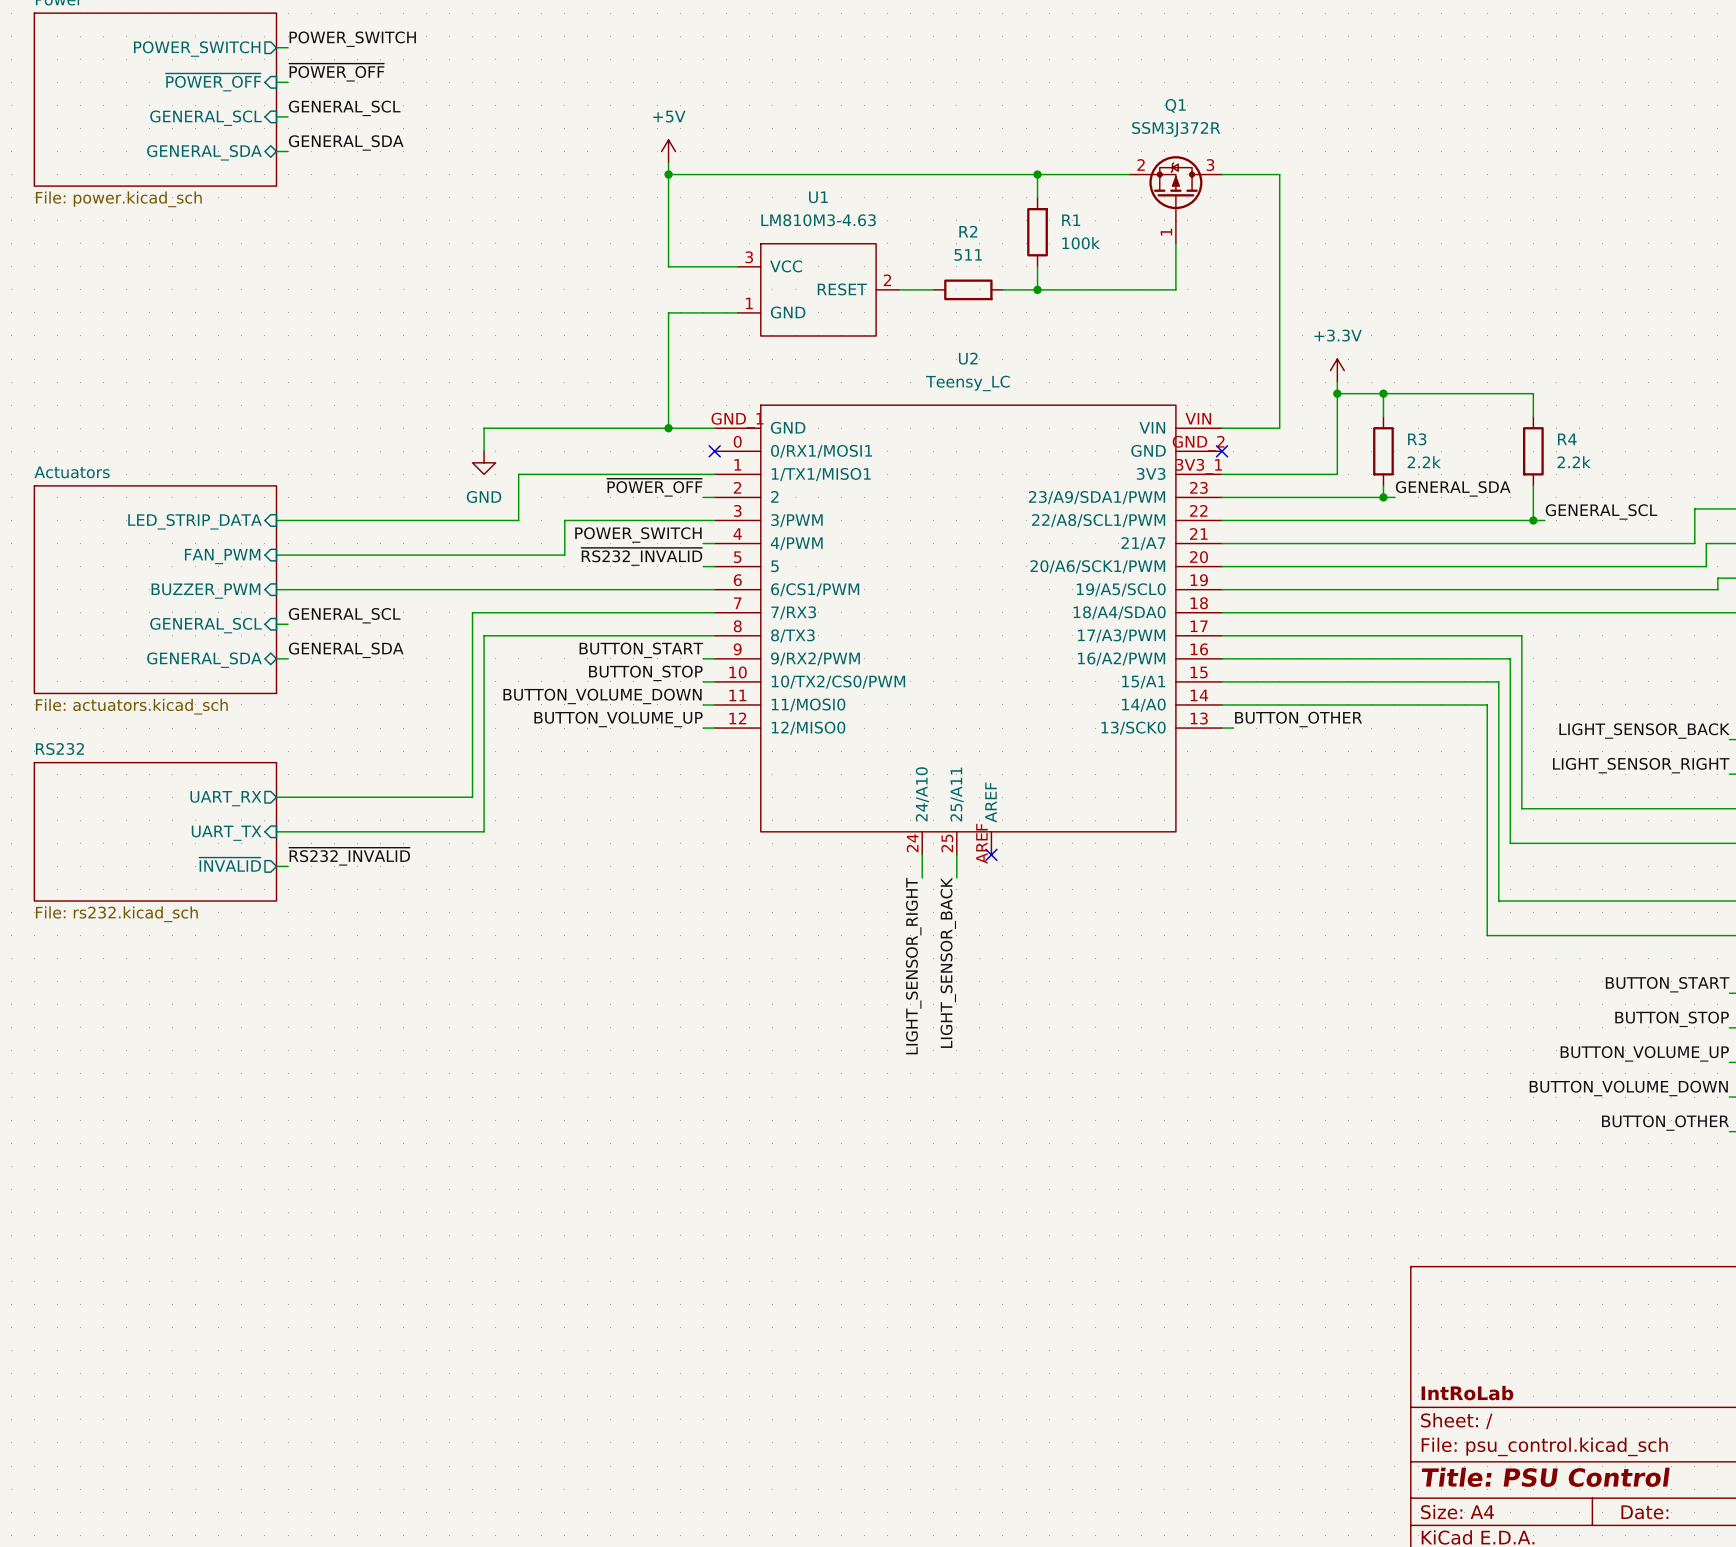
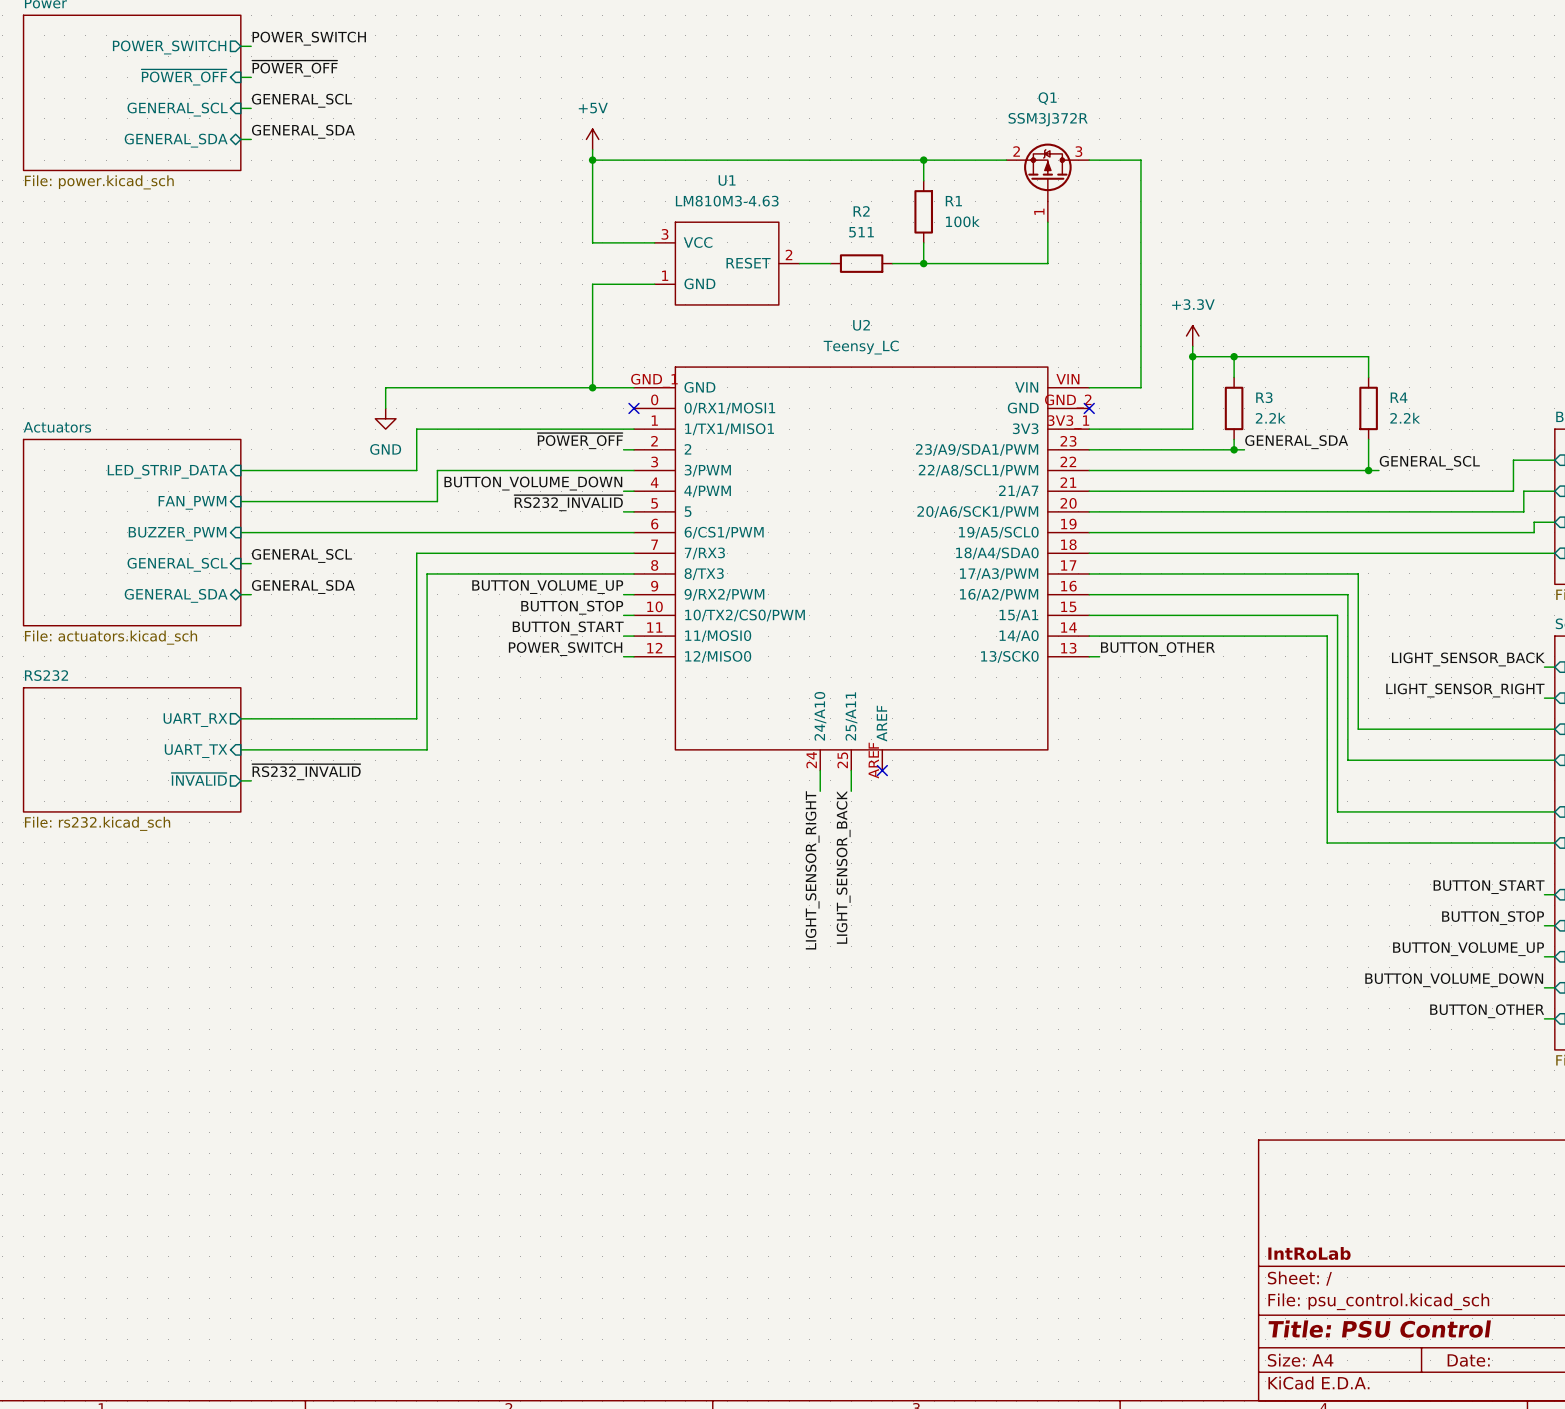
wire: (484, 428) (484, 451) -> (427, 387) (385, 387) (385, 408)
power symbol position: GND (484, 462) -> GND (385, 418)
wire: (518, 474) (518, 520) -> (458, 429) (416, 429) (416, 470)
wire: (472, 520) (495, 520) -> (437, 501) (437, 470)
wire: (564, 520) (564, 555) (495, 555) -> (499, 470) (458, 470)
label: POWER_SWITCH (638, 535) -> BUTTON_VOLUME_DOWN (533, 483)
label: BUTTON_START (641, 650) -> BUTTON_VOLUME_UP (547, 587)
label: BUTTON_VOLUME_DOWN (602, 696) -> BUTTON_START (568, 628)
label: BUTTON_VOLUME_UP (618, 719) -> POWER_SWITCH (565, 649)

